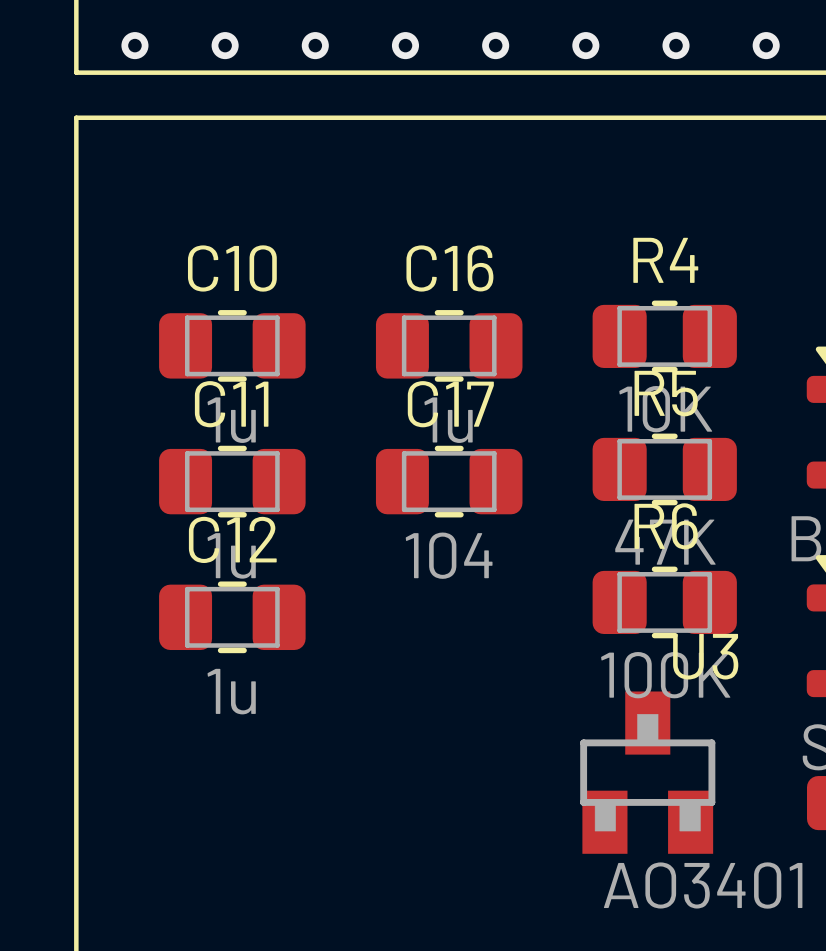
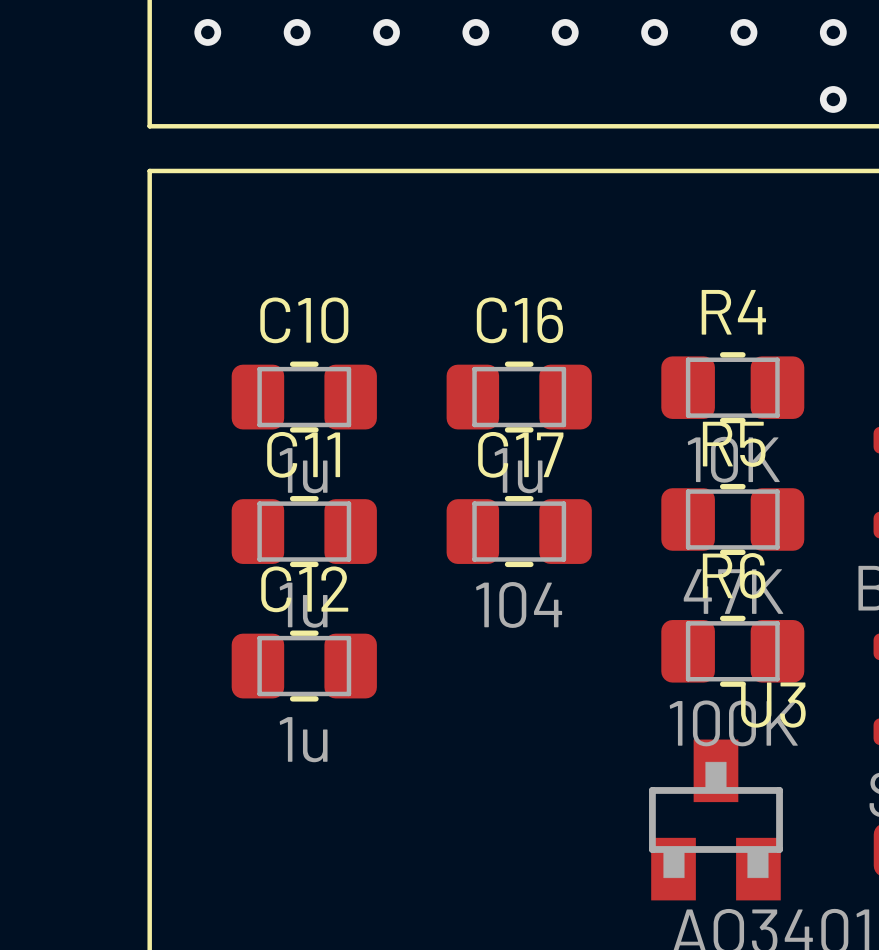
via: (134, 45) -> none
via: (225, 45) -> none
via: (315, 45) -> none
via: (405, 45) -> none
via: (495, 45) -> none
via: (585, 45) -> none
via: (676, 45) -> none

